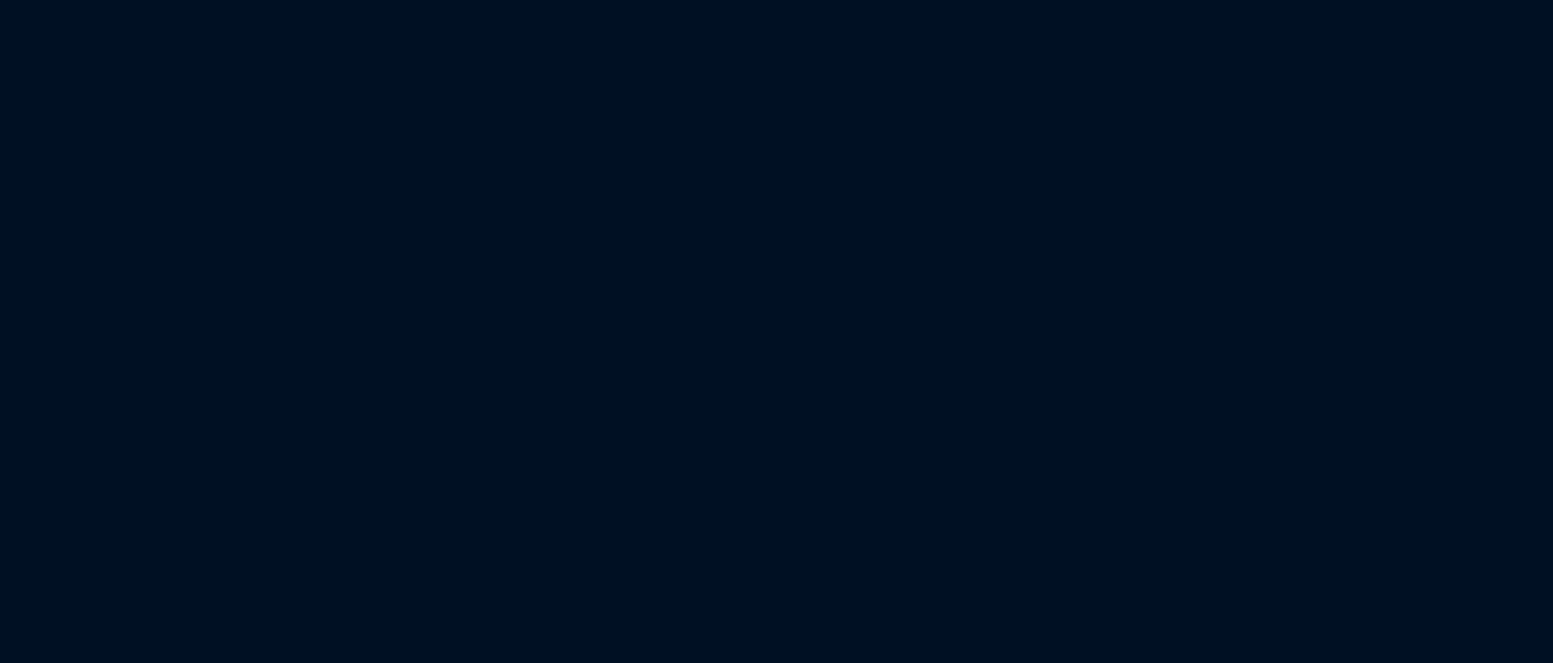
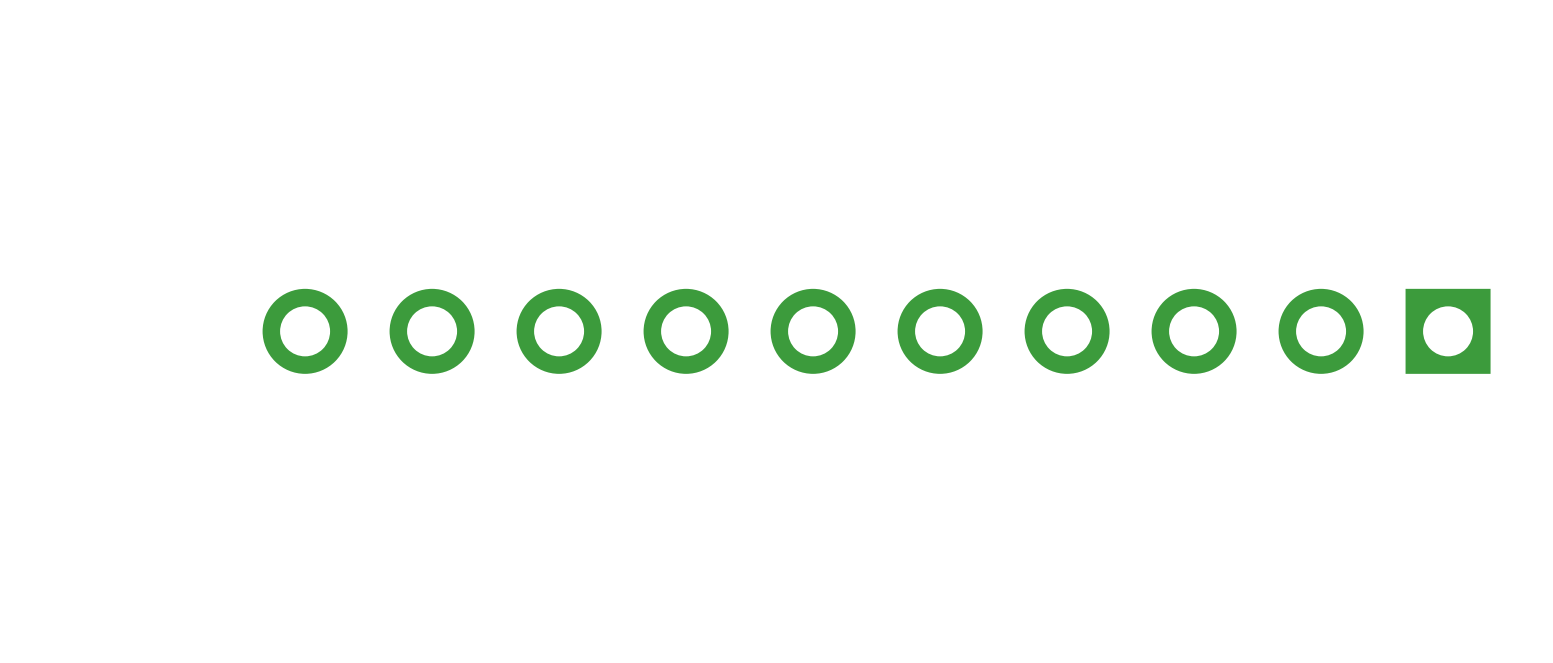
part: none -> (876, 331)

